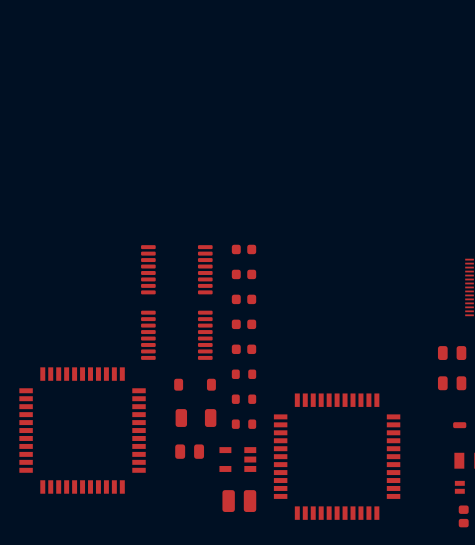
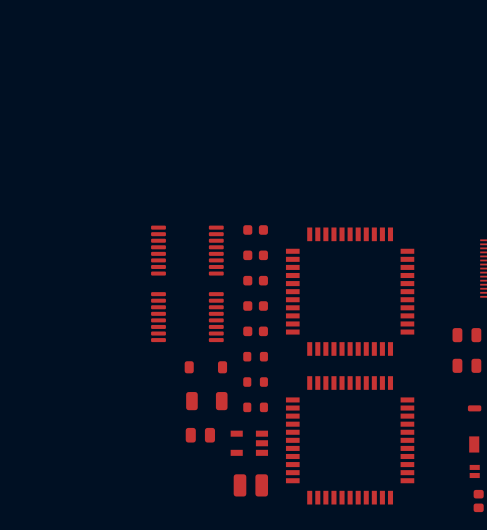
part: none -> (350, 291)
part: (82, 430) -> none

